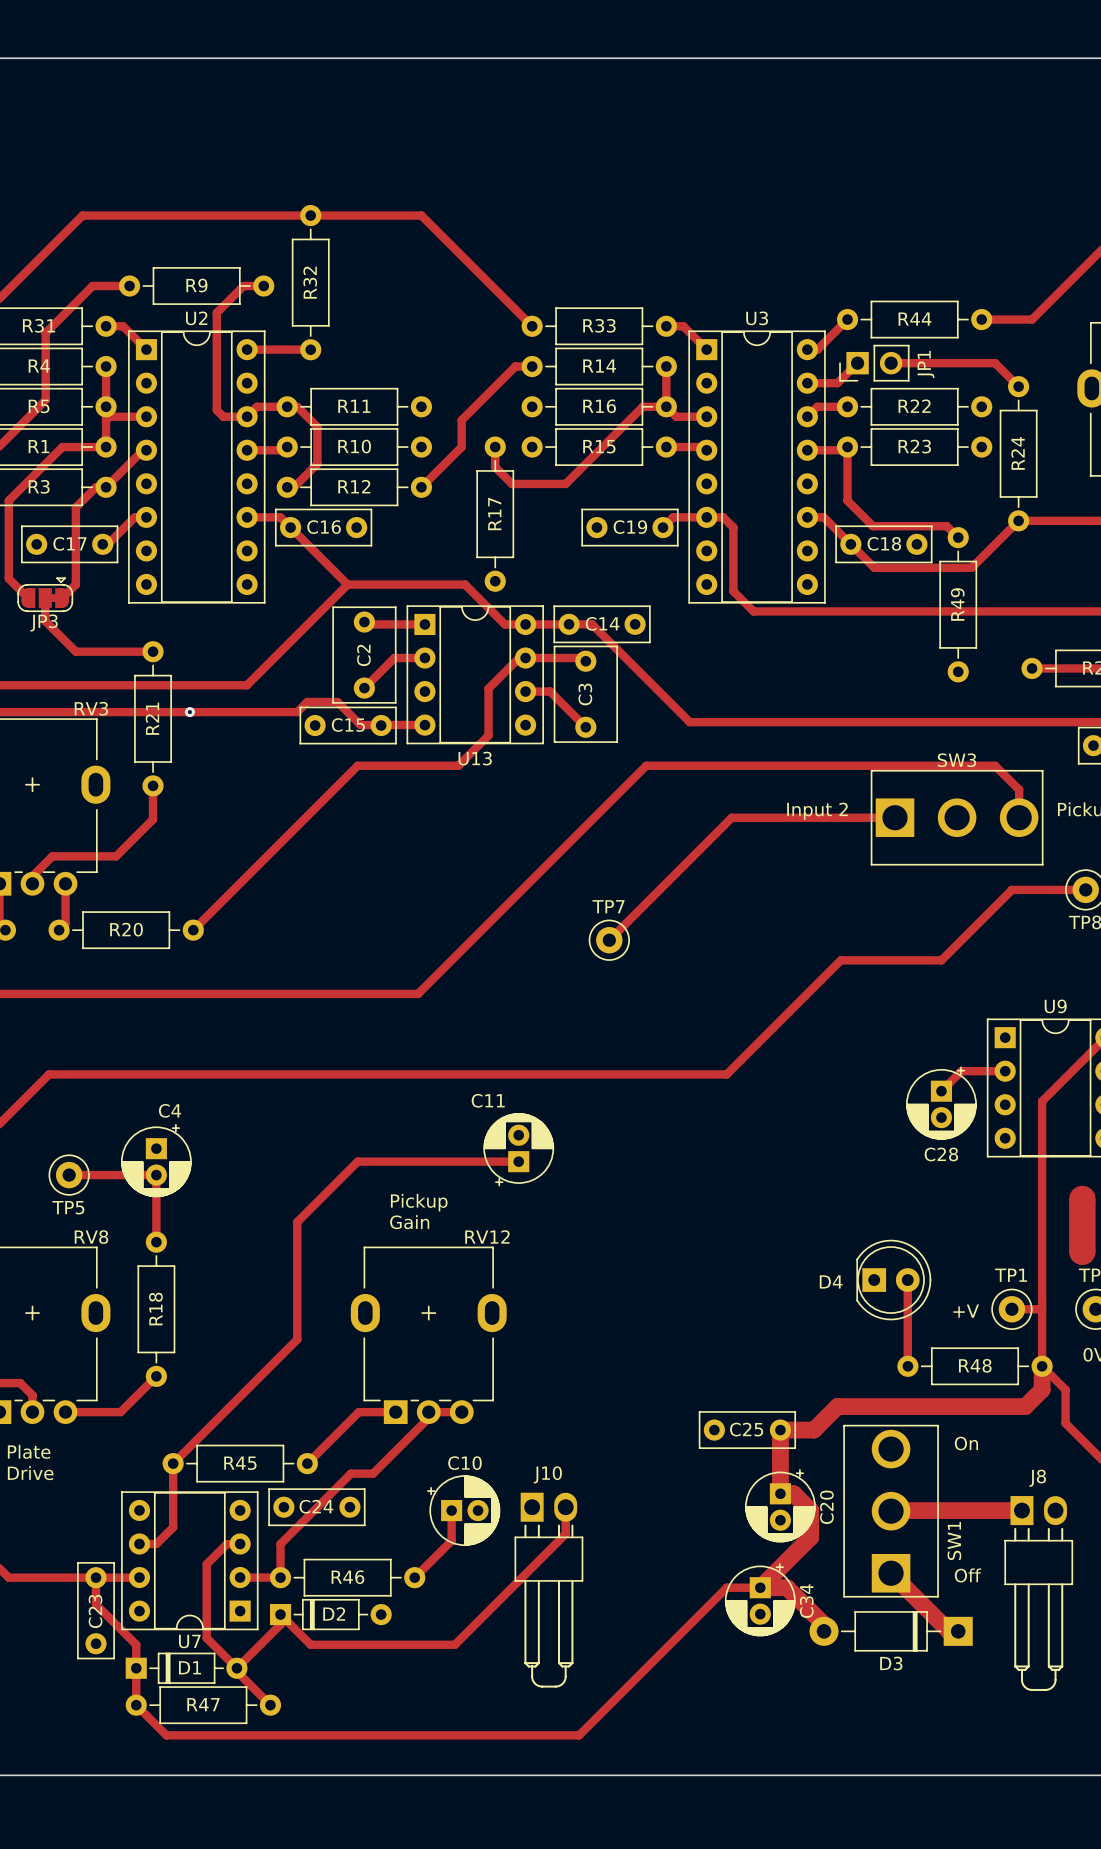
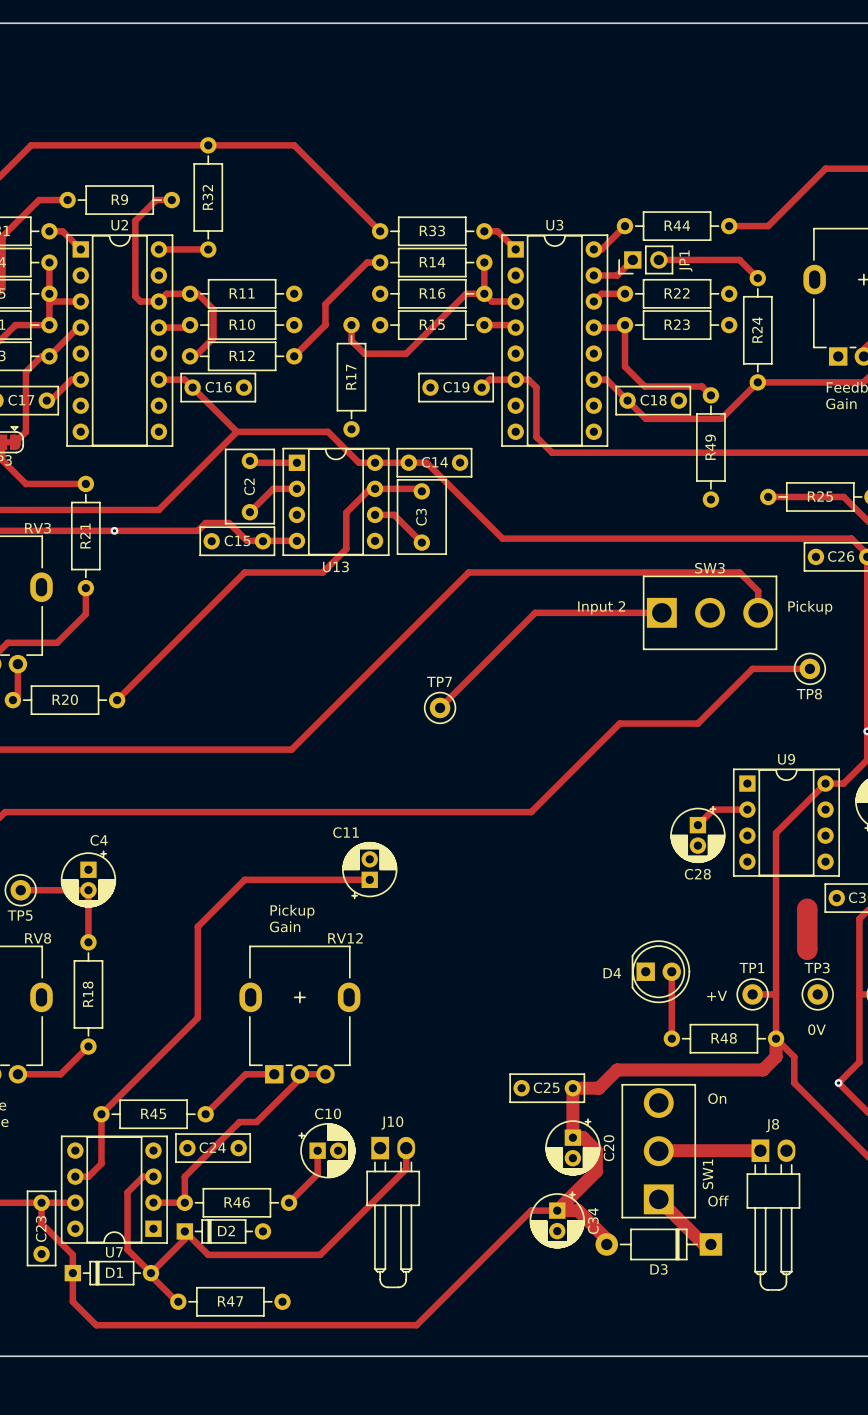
R47 position: (203, 1705) -> (230, 1301)

